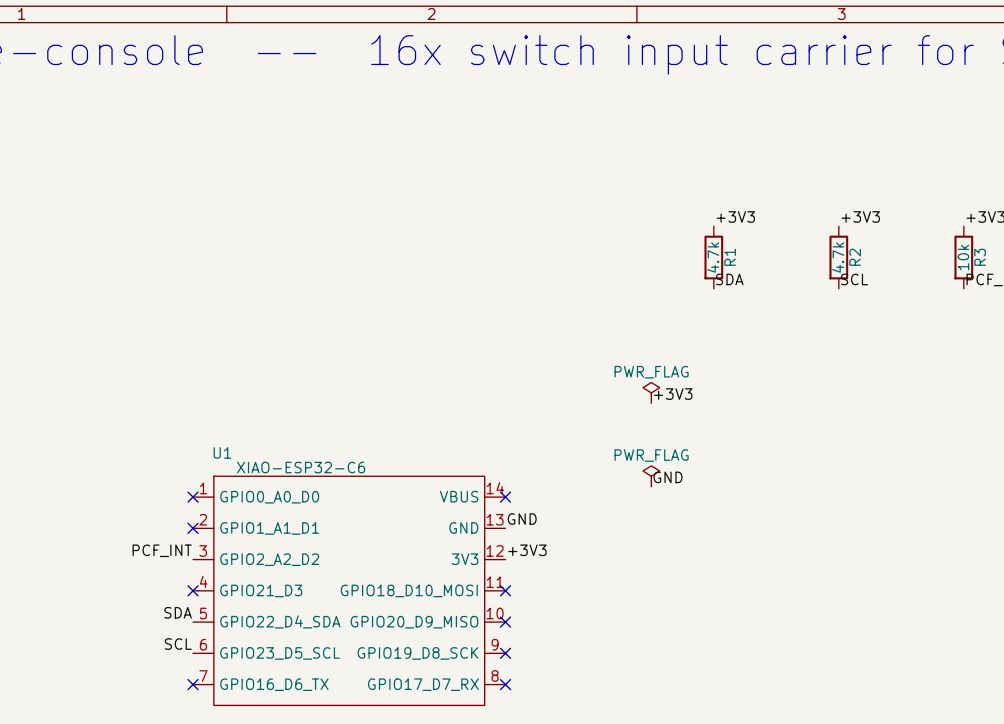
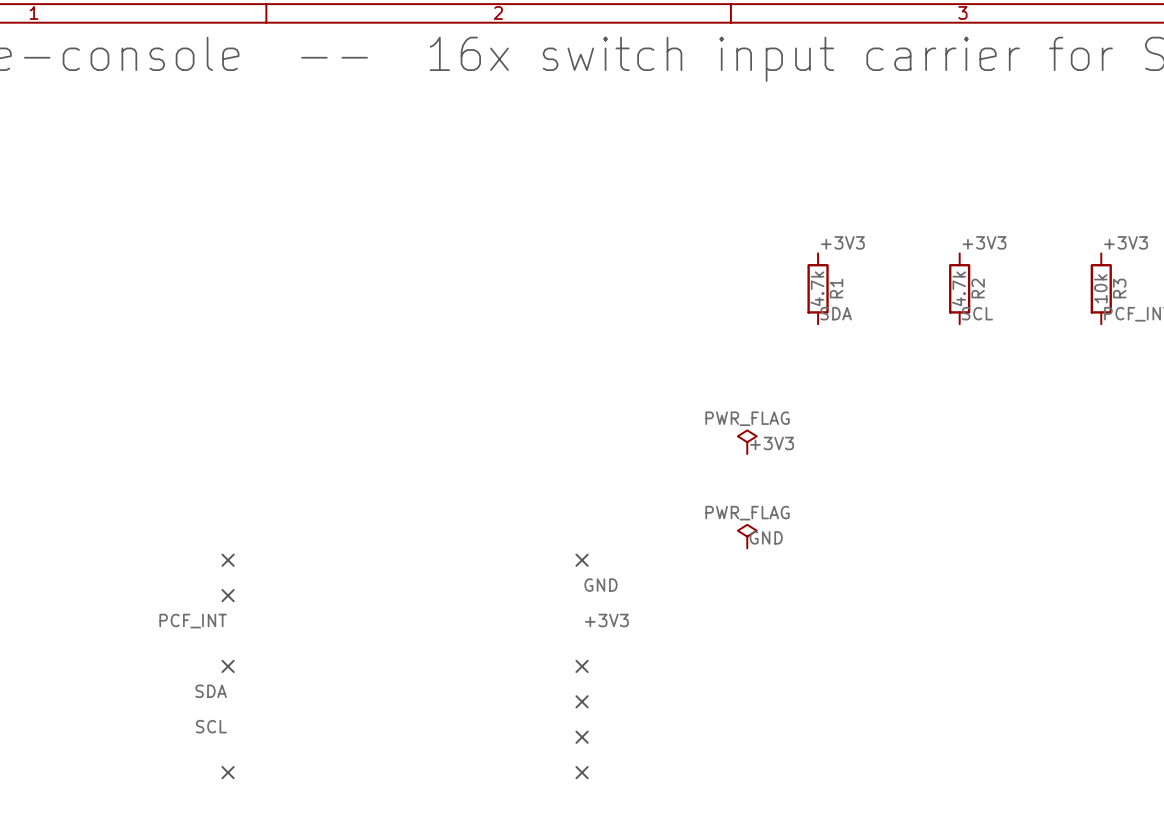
U1: XIAO-ESP32-C6 (349, 590) -> none

